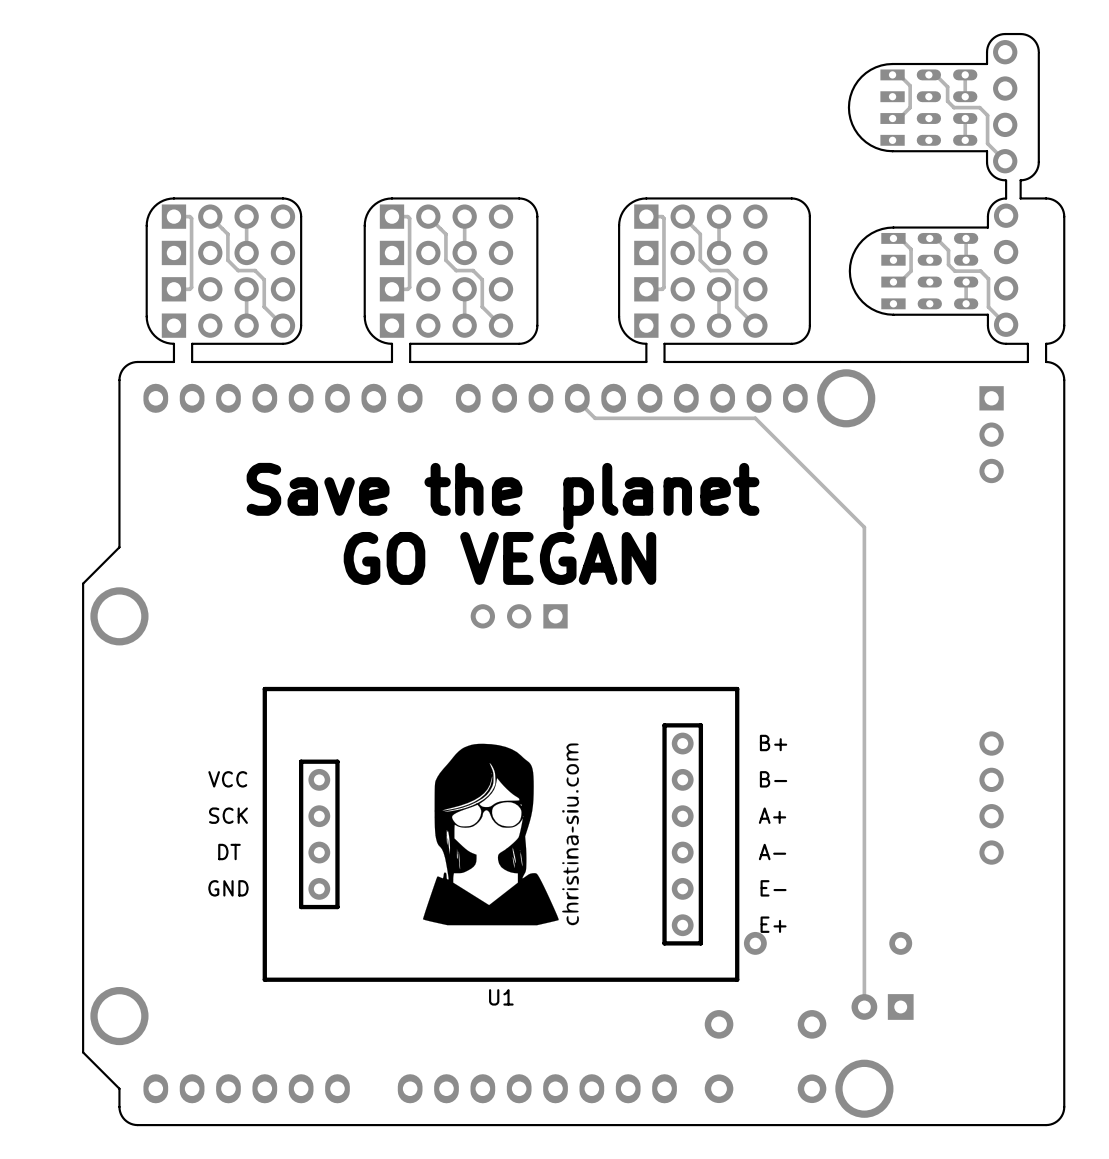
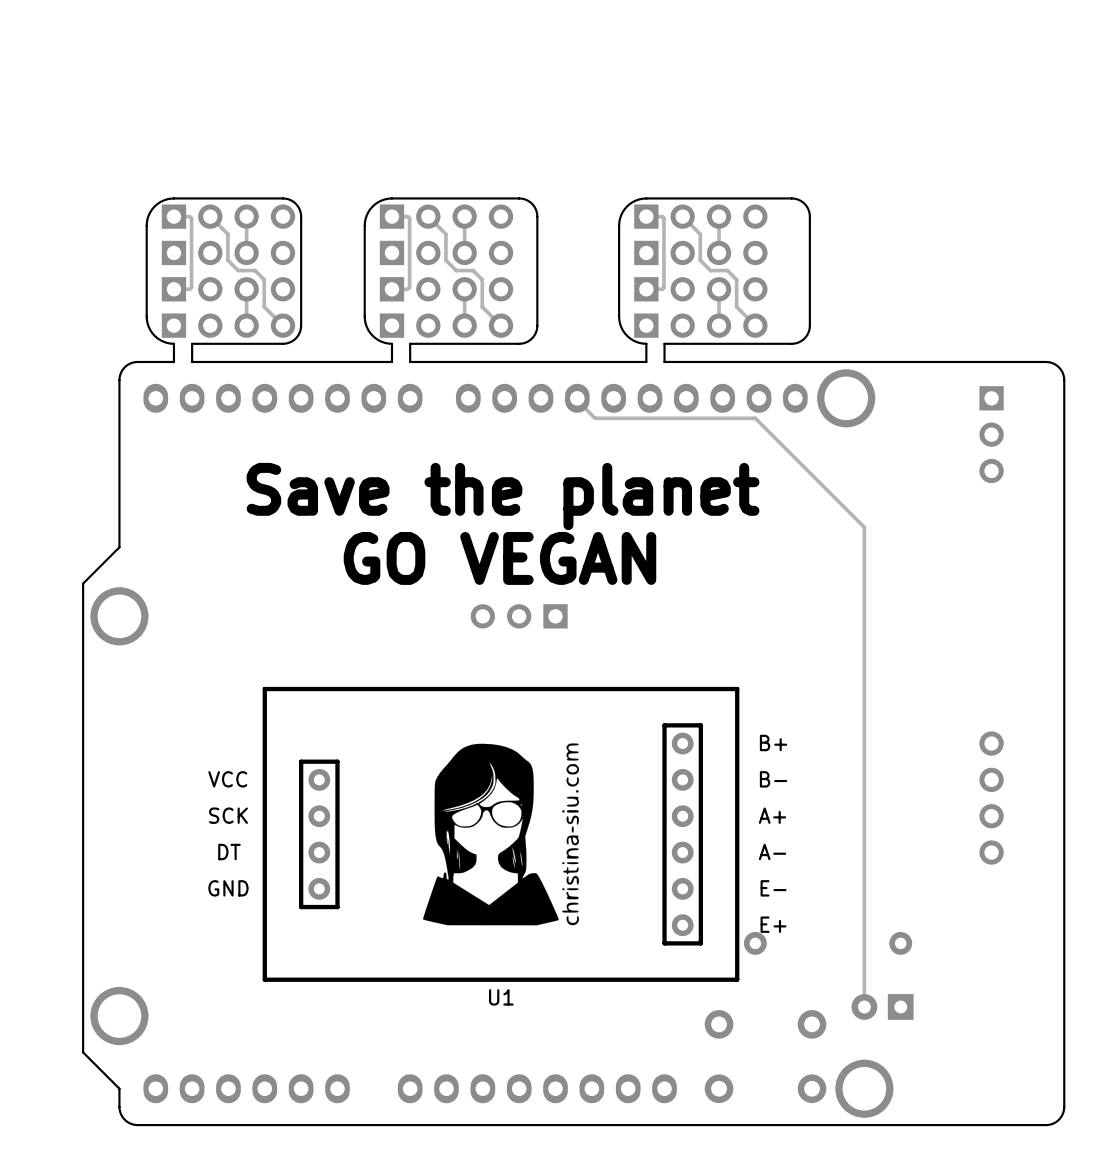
board edge: (1038, 52) (1036, 43) (1027, 35) (1000, 34) (992, 39) (988, 45) (987, 64) (881, 65) (861, 76) (850, 96) (849, 113) (852, 124) (861, 138) (870, 145) (892, 151) (987, 151) (989, 171) (996, 177) (1005, 180) -> none
board edge: (1038, 53) (1038, 164) (1031, 176) (1020, 180) (1020, 198) (1053, 199) (1060, 205) (1064, 216) (1064, 328) (1057, 340) (1046, 343) (1046, 361) -> none
track: (892, 74) (899, 74) (910, 85) (910, 107) (899, 118) (892, 118) -> none
track: (928, 74) (935, 74) (947, 86) (947, 101) (954, 107) (979, 107) (987, 115) (987, 143) (1005, 161) -> none
part: (928, 74) -> none
track: (965, 74) (965, 96) -> none
part: (928, 96) -> none
part: (1005, 106) -> none
part: (928, 118) -> none
track: (965, 118) (965, 140) -> none
part: (928, 140) -> none
board edge: (1006, 180) (1006, 198) -> none
board edge: (1006, 198) (997, 200) (990, 207) (987, 227) (893, 227) (871, 233) (862, 240) (853, 254) (850, 276) (853, 287) (862, 301) (882, 313) (987, 314) (988, 330) (995, 340) (1003, 343) (1027, 343) (1027, 361) -> (1046, 361) (1027, 361)
track: (893, 238) (900, 238) (911, 249) (911, 271) (900, 282) (893, 282) -> none
track: (929, 238) (936, 238) (948, 250) (948, 264) (954, 271) (980, 271) (988, 278) (988, 307) (1006, 324) -> none
part: (929, 238) -> none
track: (966, 238) (966, 260) -> none
part: (929, 260) -> none
part: (1006, 270) -> none
part: (929, 282) -> none
track: (966, 282) (966, 303) -> none
part: (929, 303) -> none

